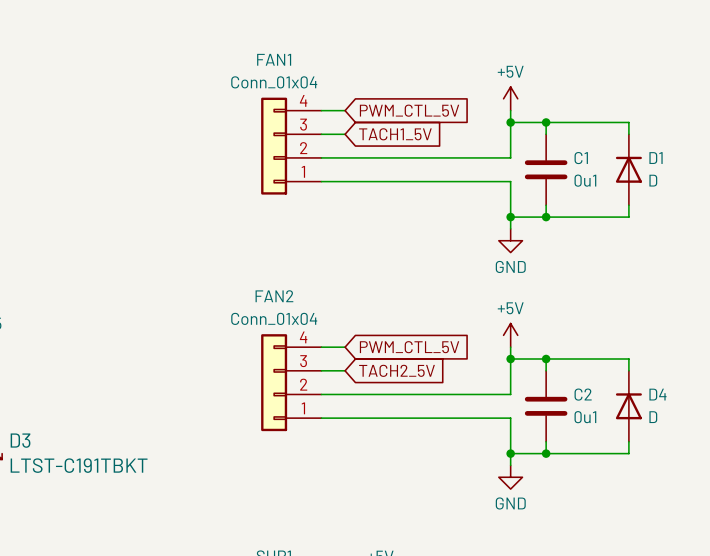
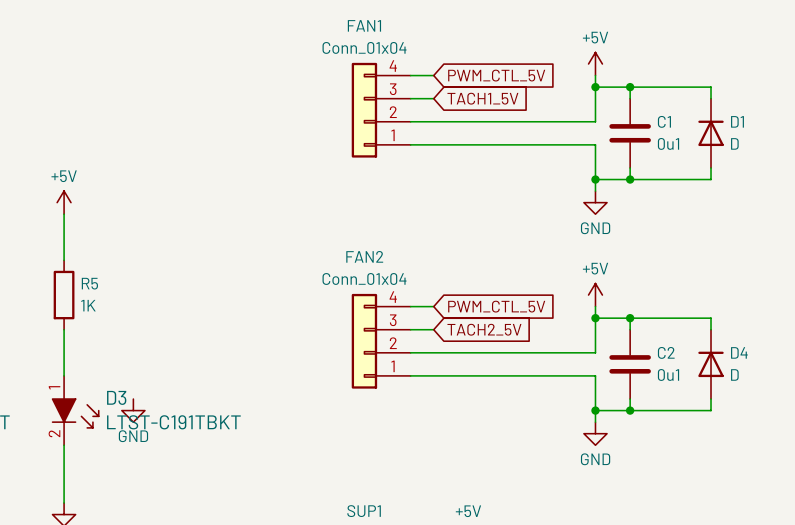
power symbol: none -> GND (133, 410)

